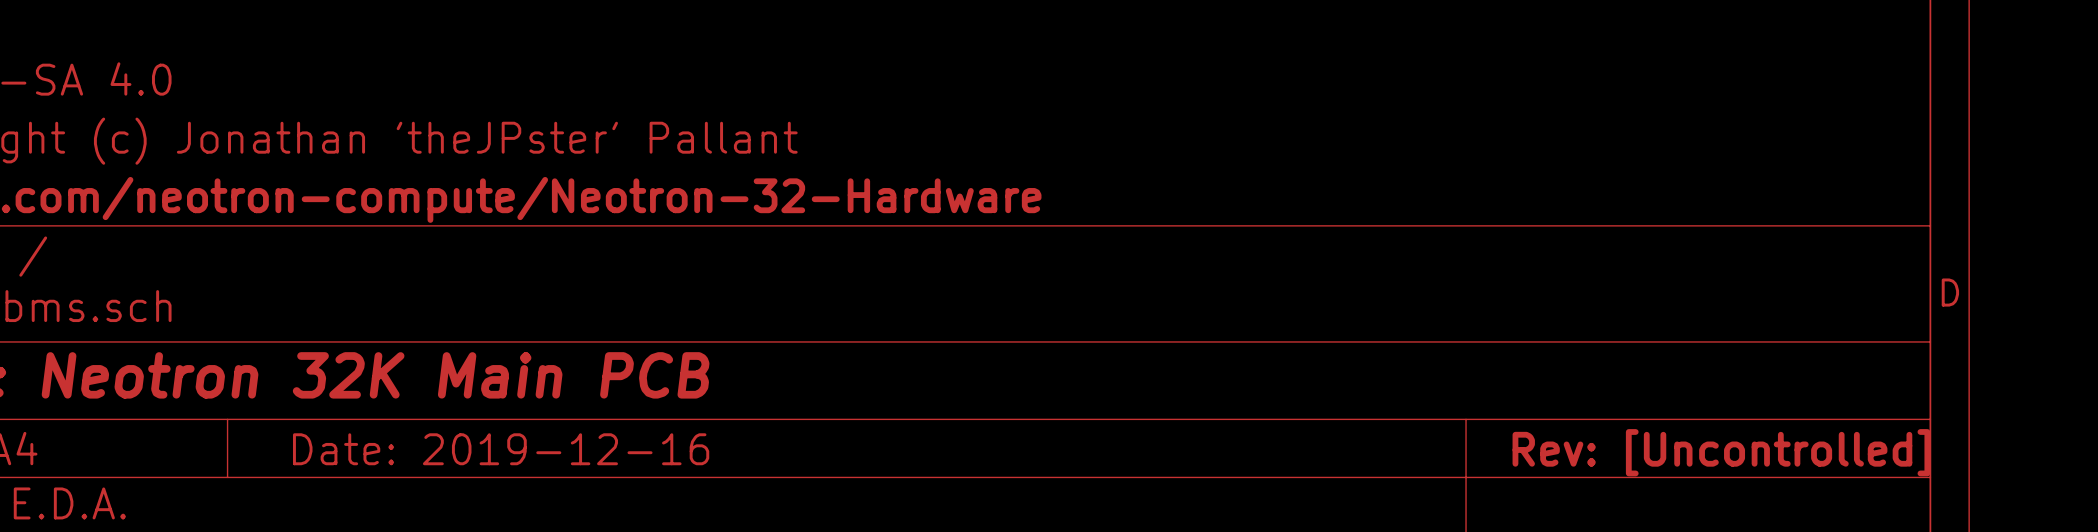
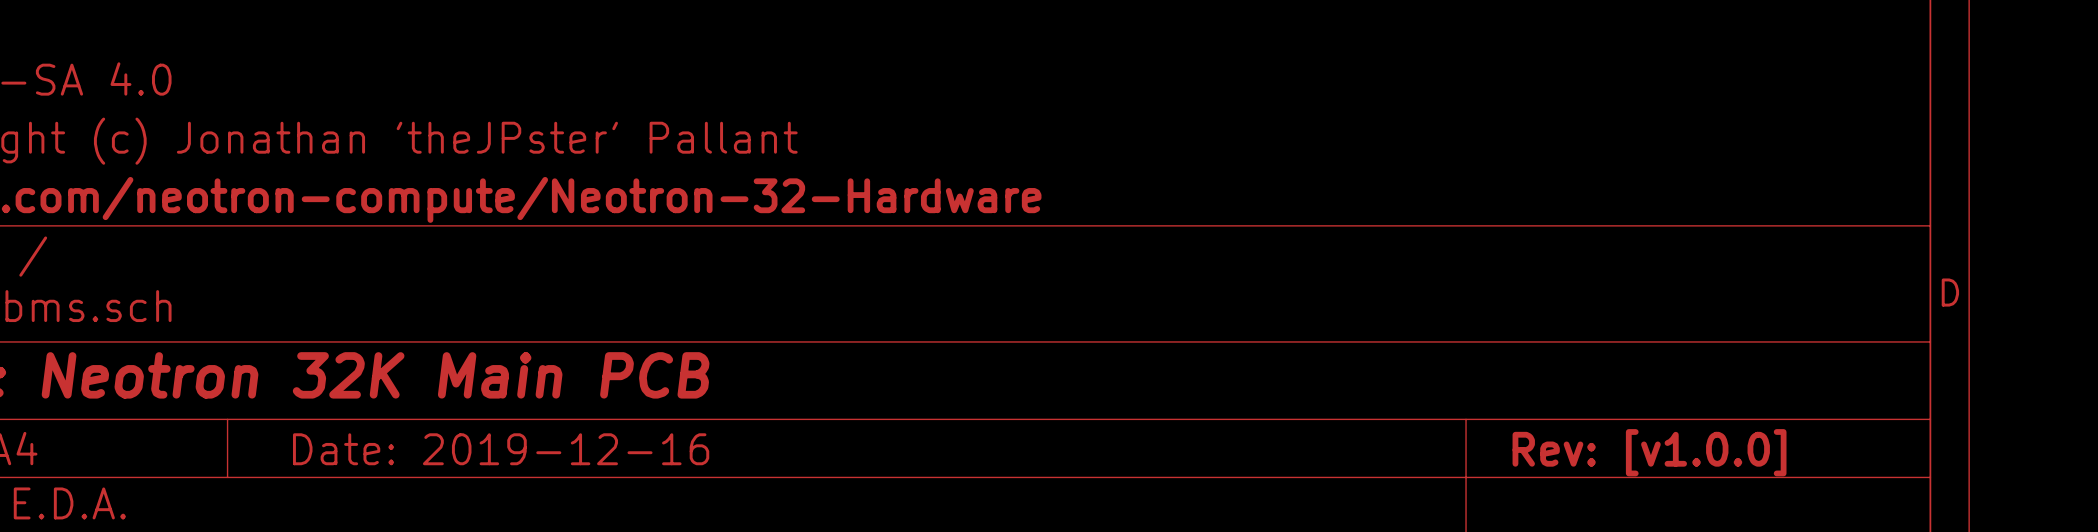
title block: Rev: [Uncontrolled] (1721, 452) -> Rev: [v1.0.0] (1649, 452)

